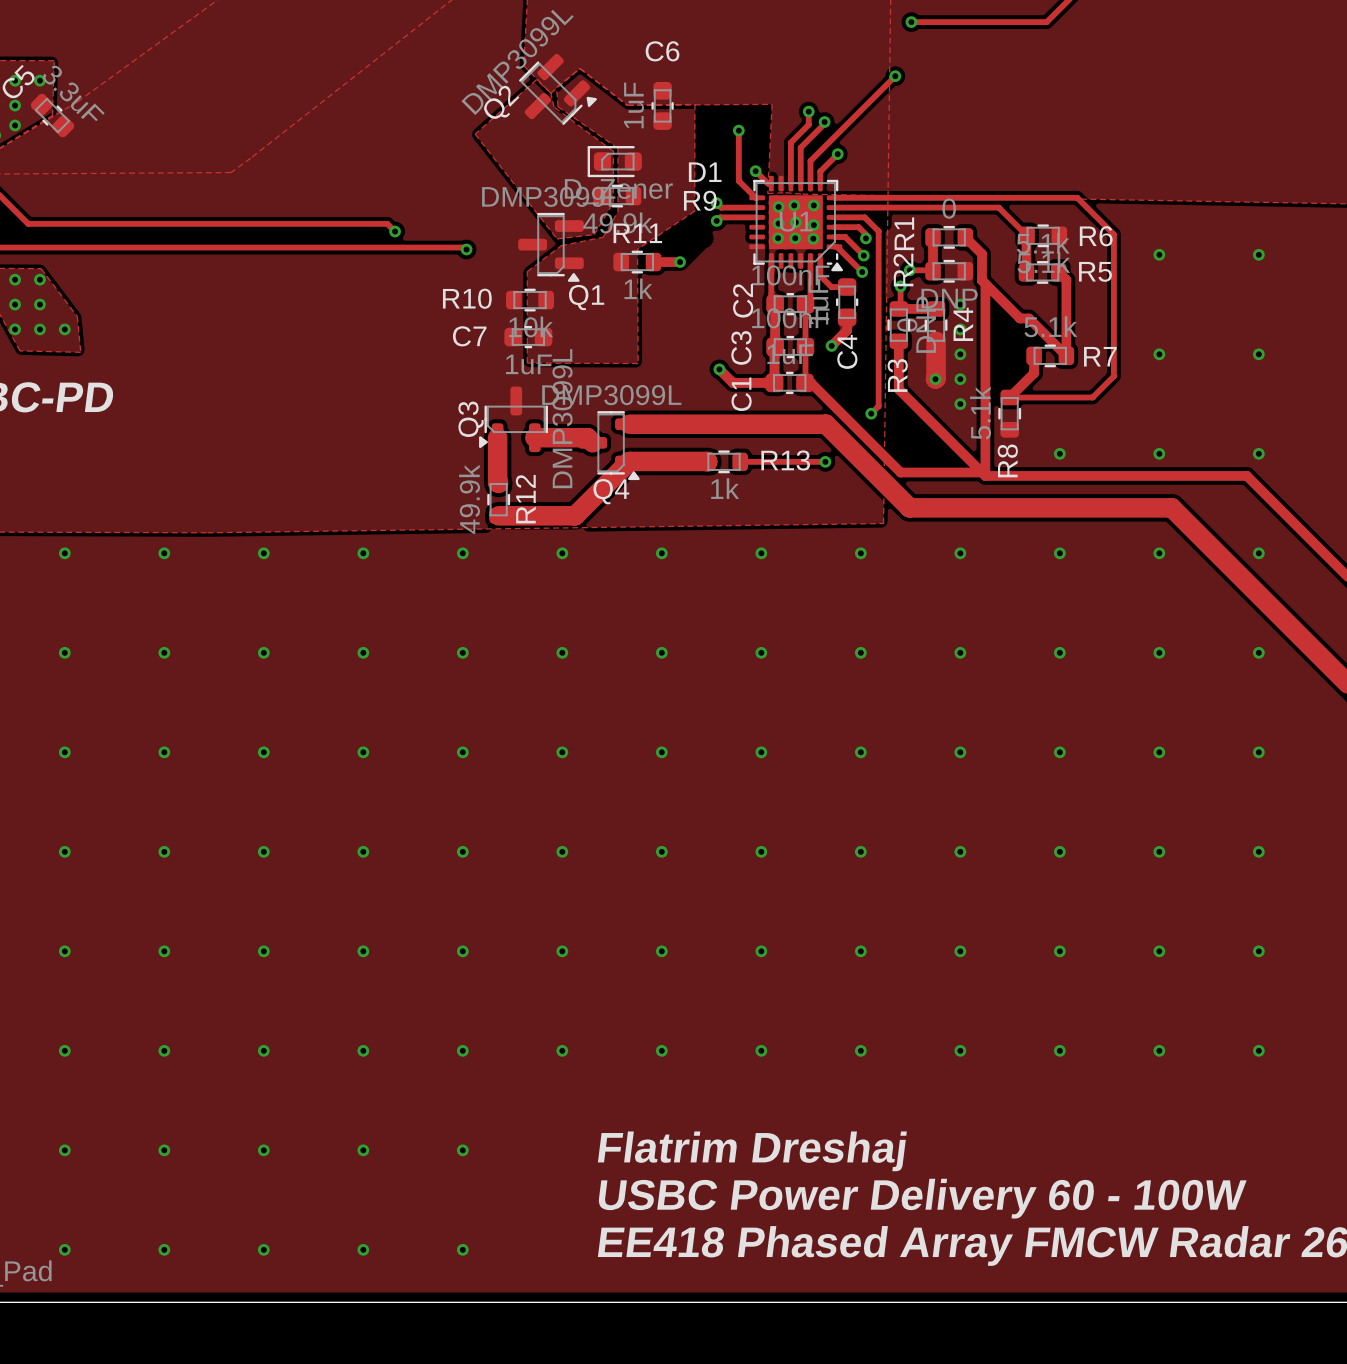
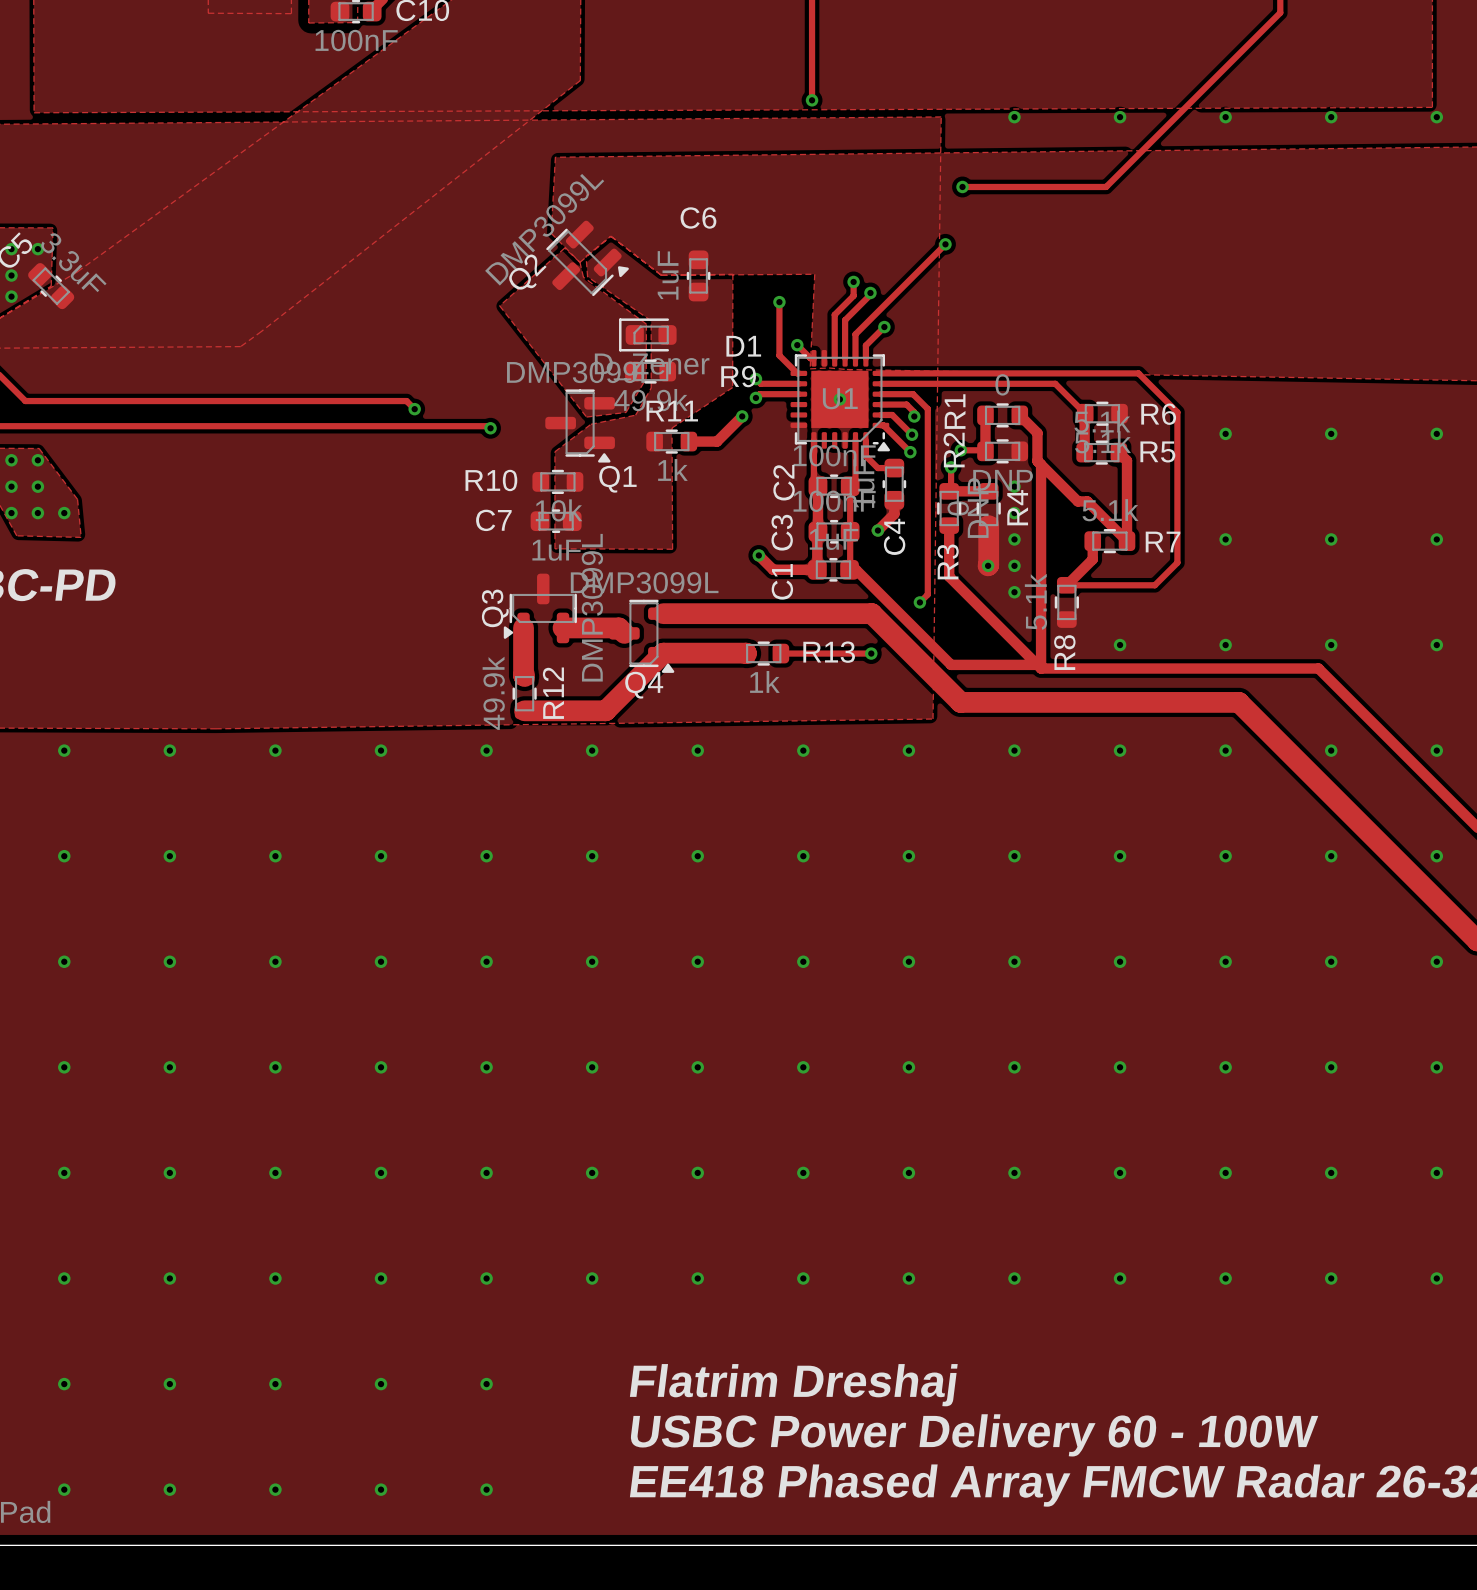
via: (794, 205) -> none
via: (813, 205) -> none
via: (778, 206) -> none
via: (778, 223) -> none
via: (813, 225) -> none
track: none -> (742, 416) (717, 441)
via: (778, 238) -> none
via: (795, 238) -> none
via: (813, 238) -> none
via position: (680, 262) -> (742, 416)

